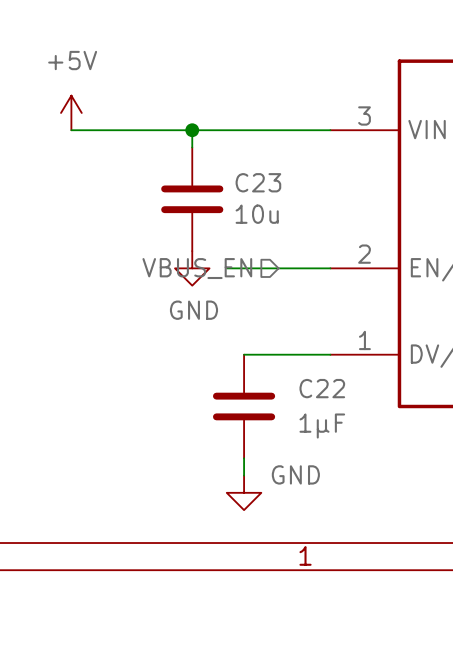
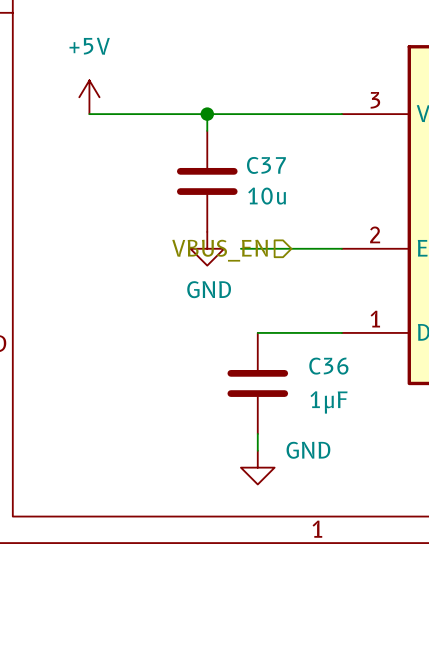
C23 name: C23 (258, 182) -> C37 (266, 165)
C22 name: C22 (322, 388) -> C36 (328, 366)

